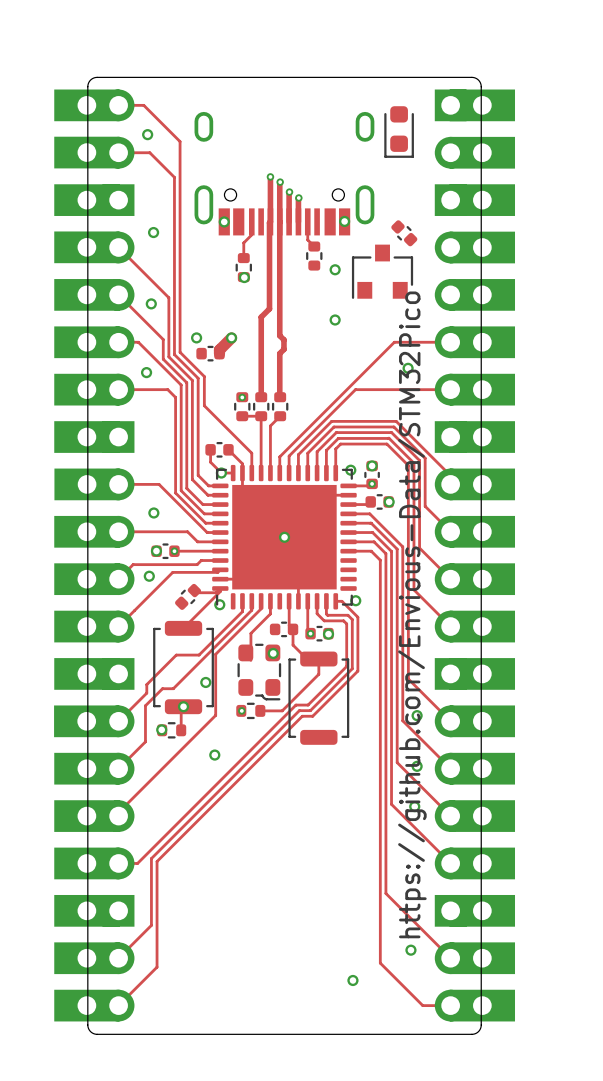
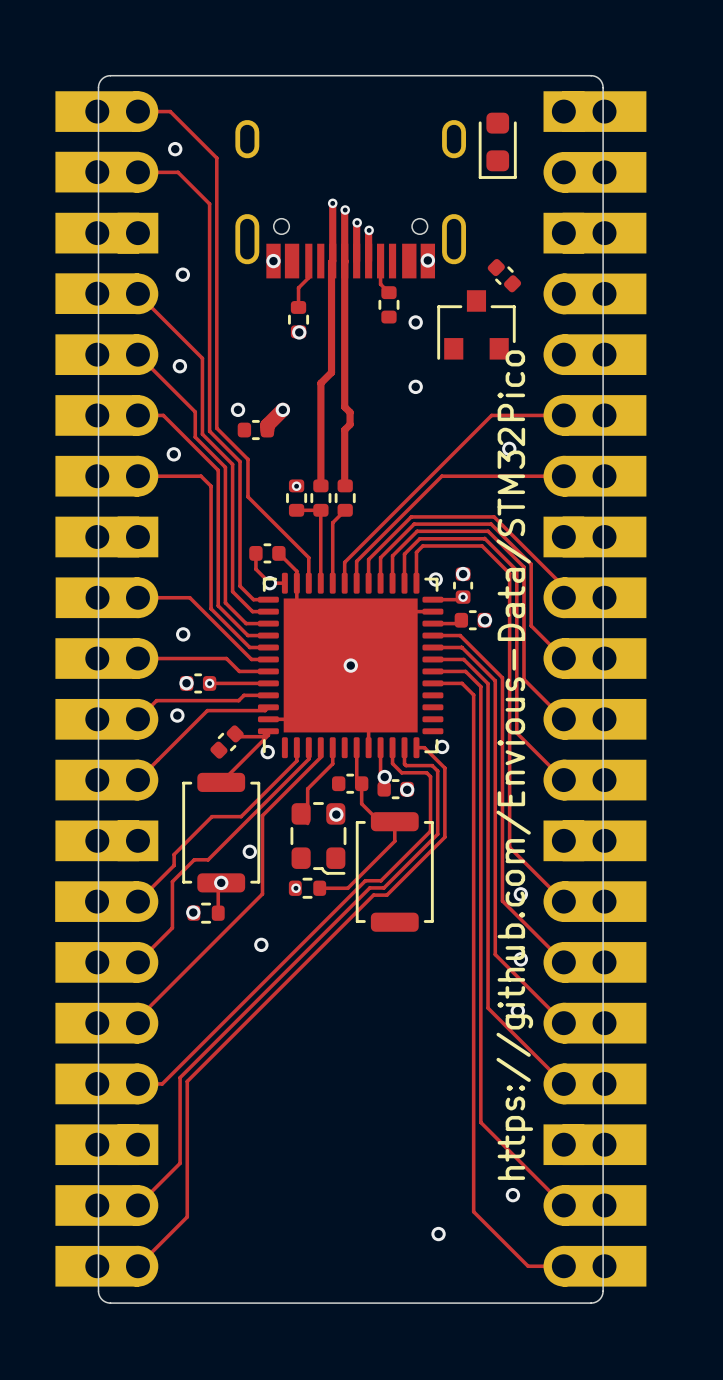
via: none -> (384, 777)
via: (310, 633) -> none

